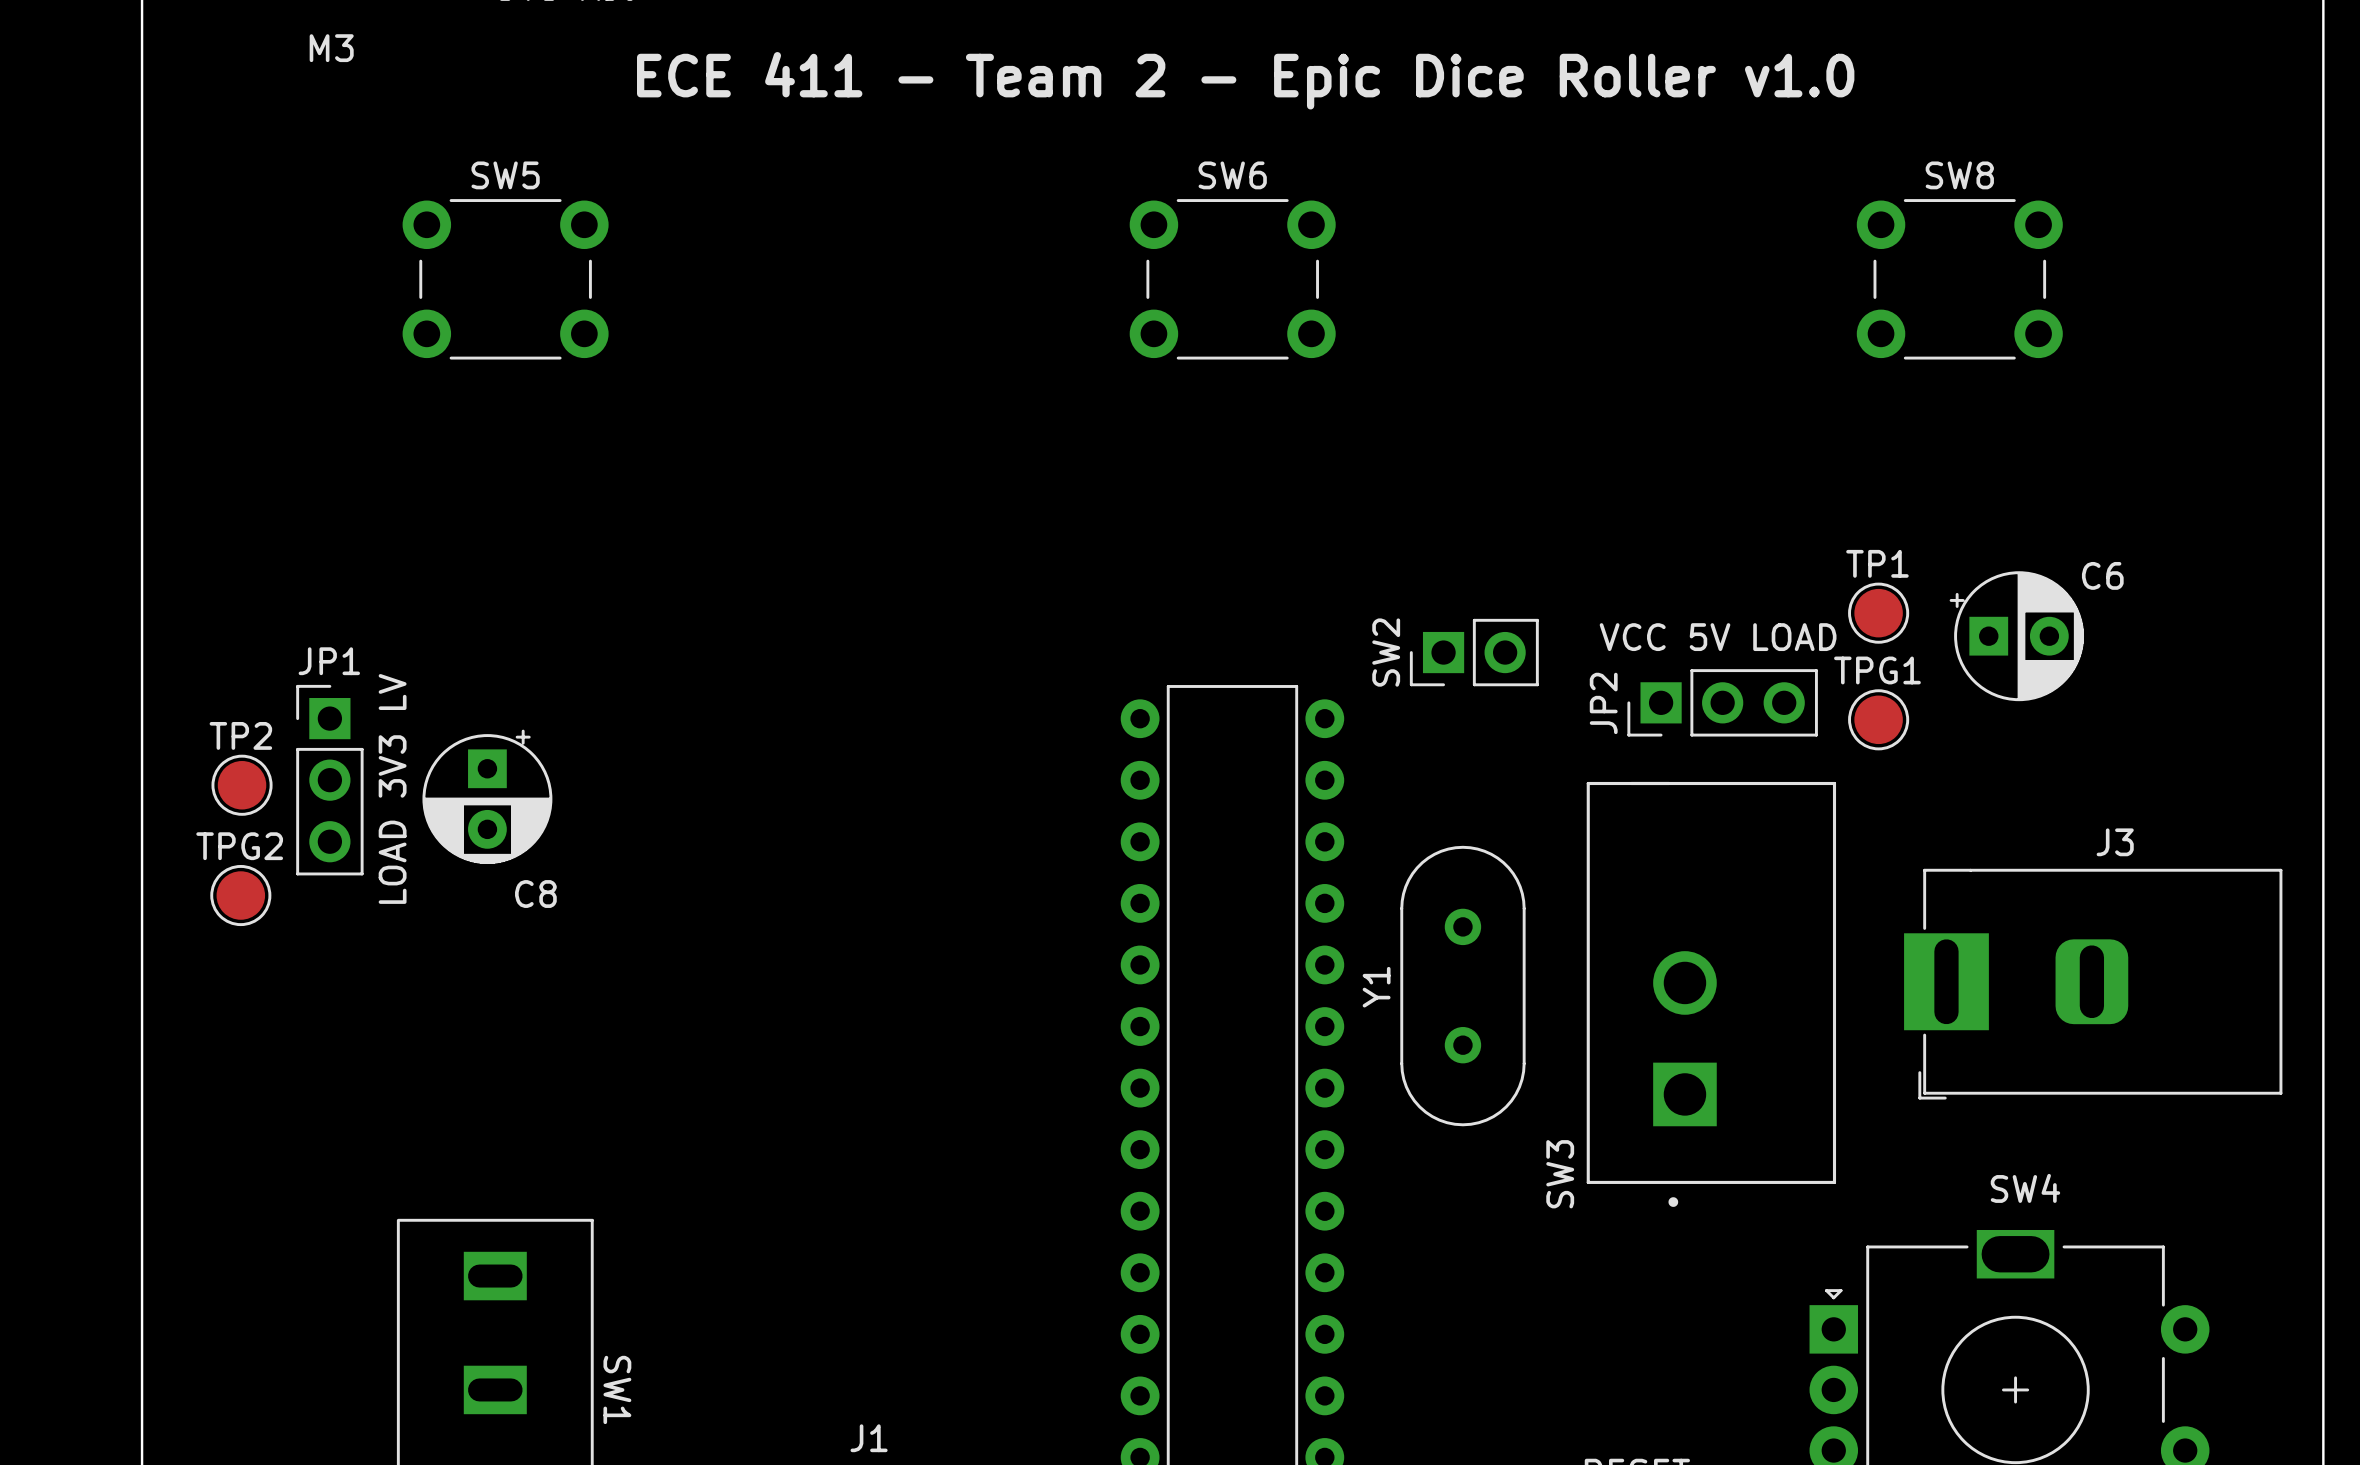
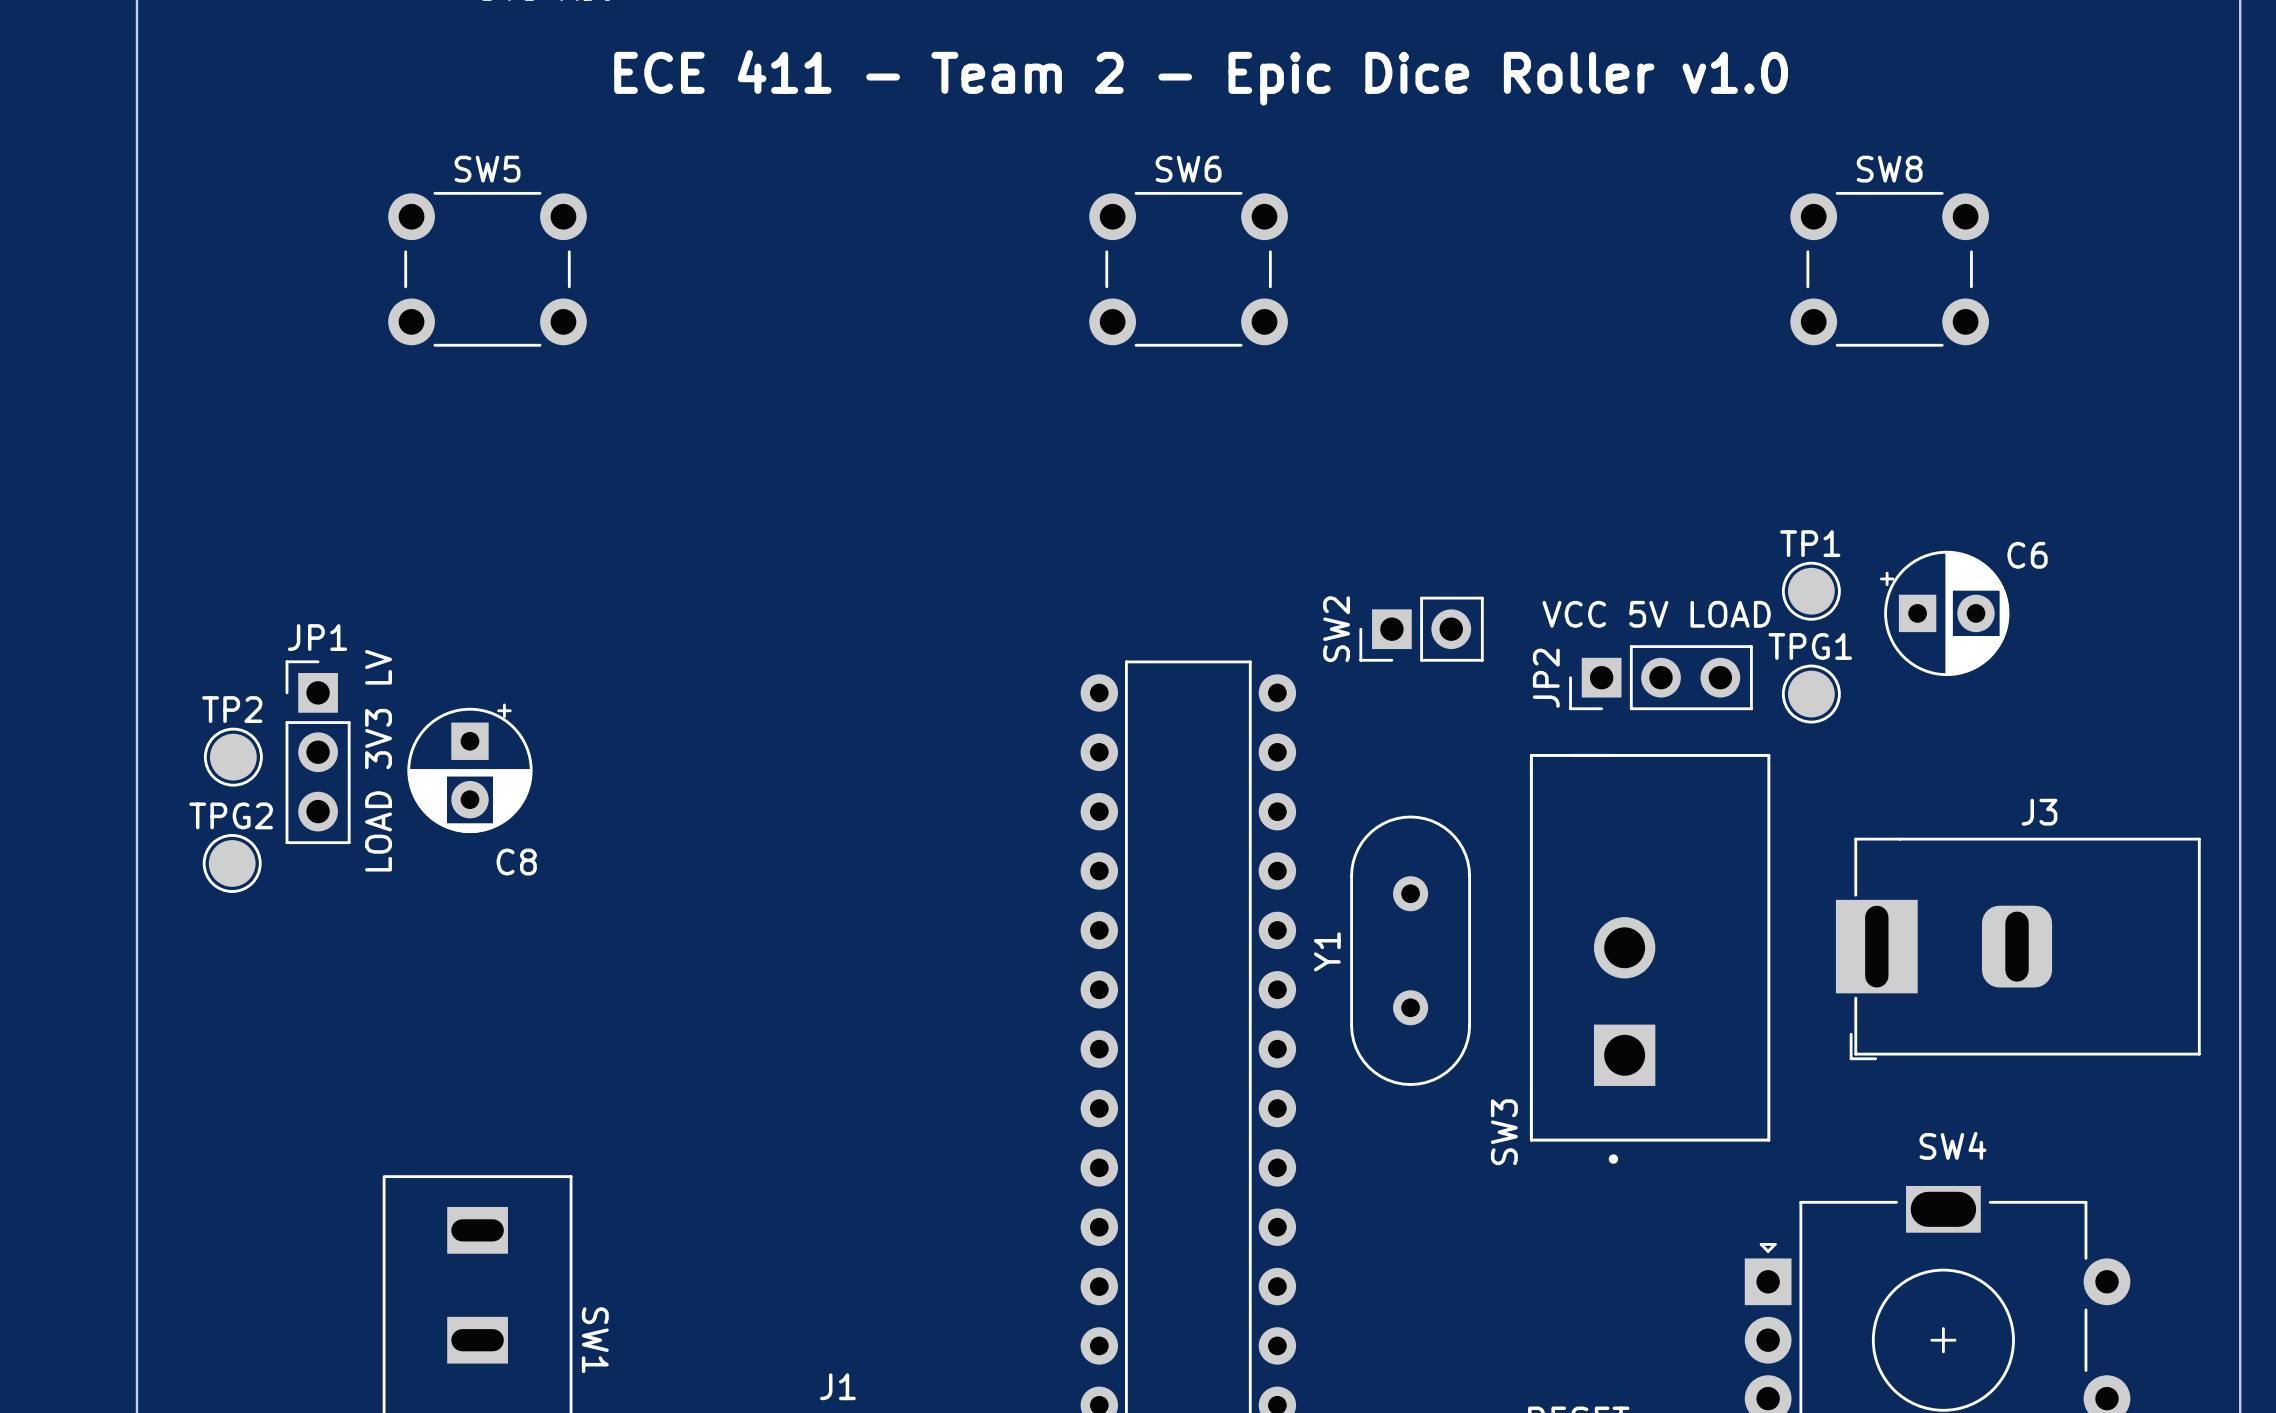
text: M3 (331, 48) -> none

